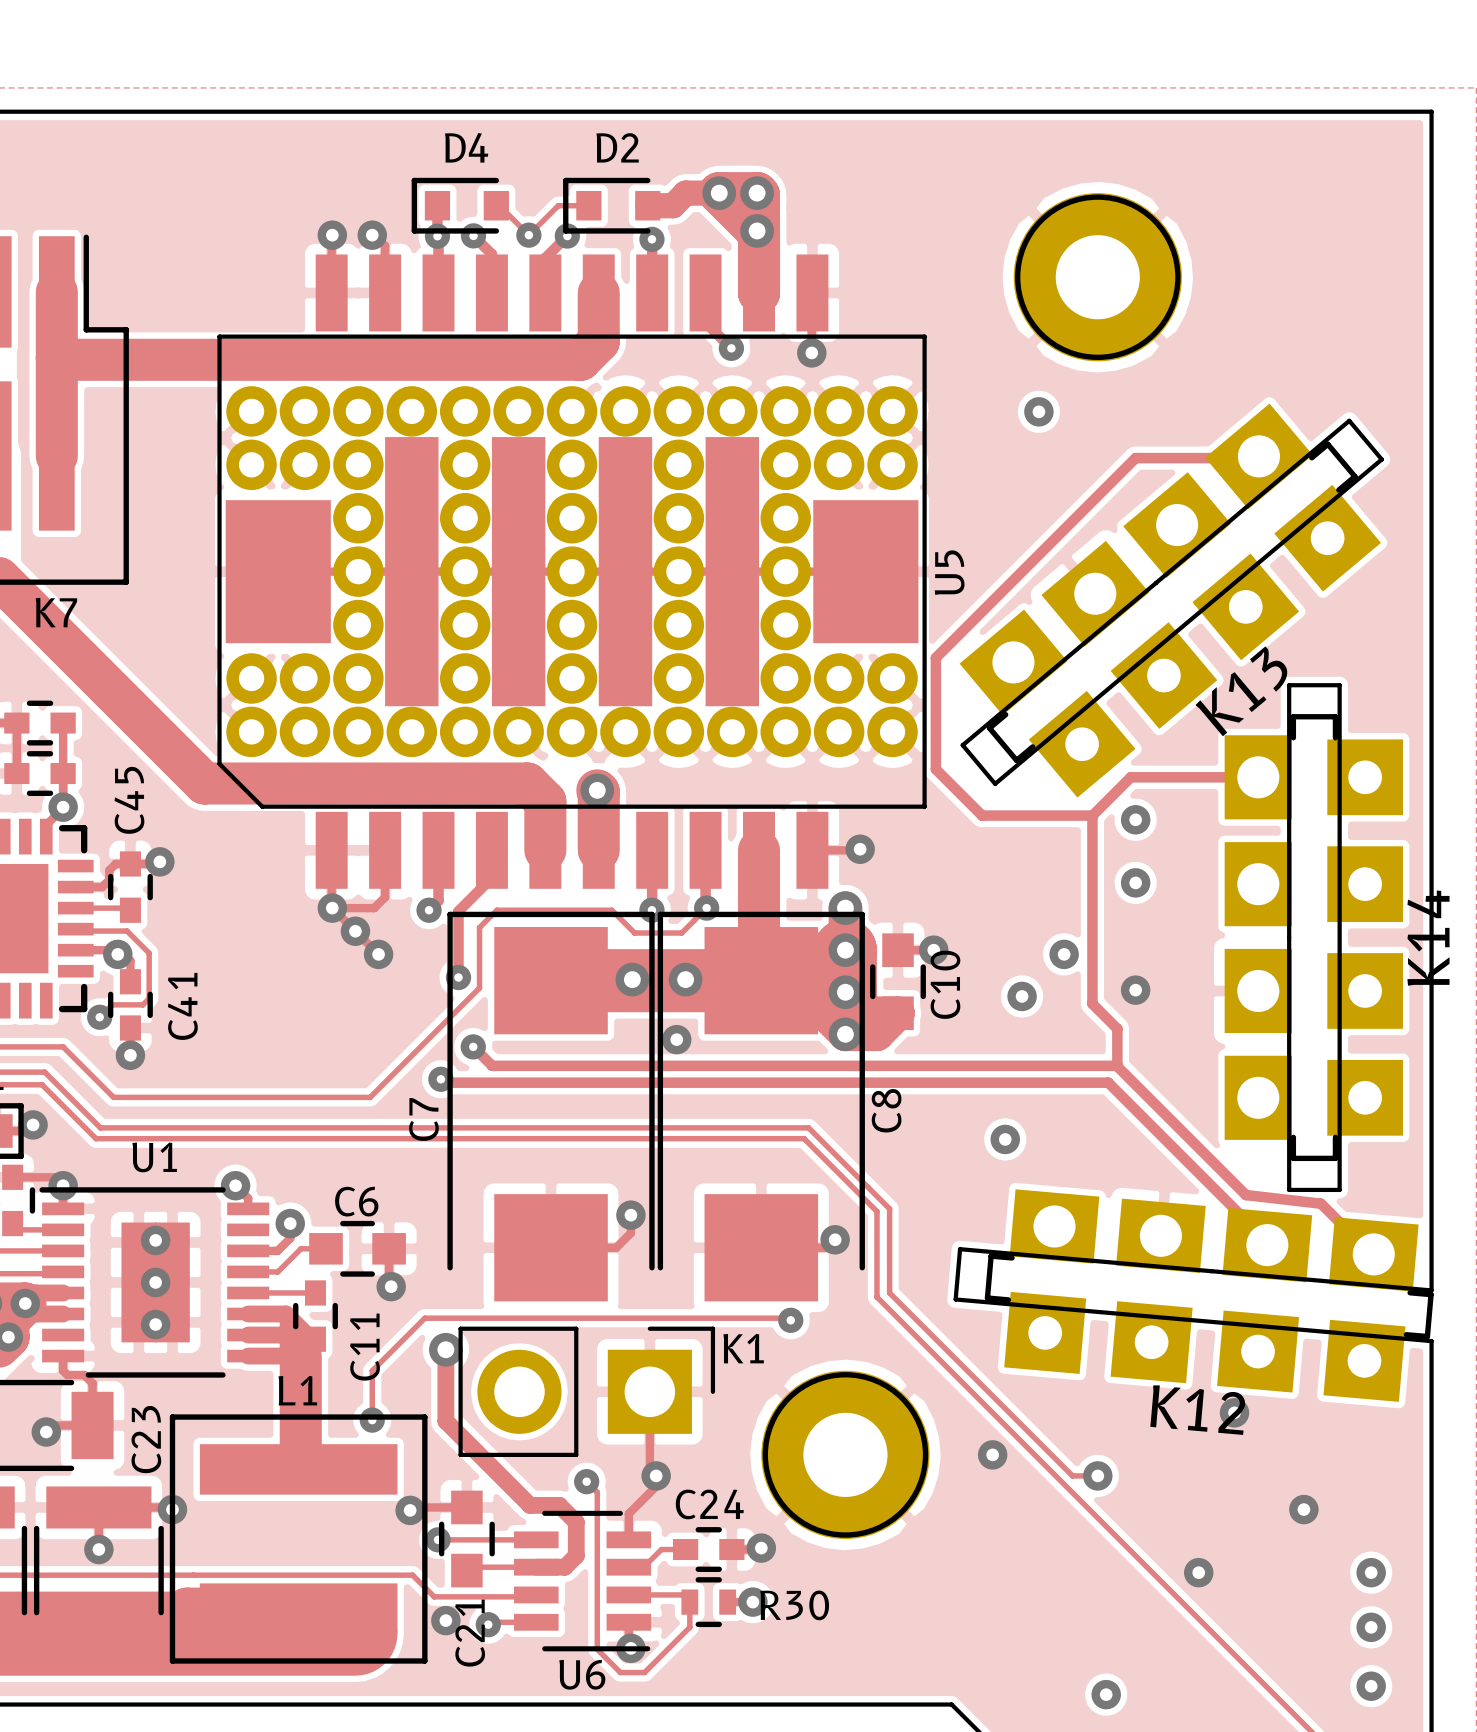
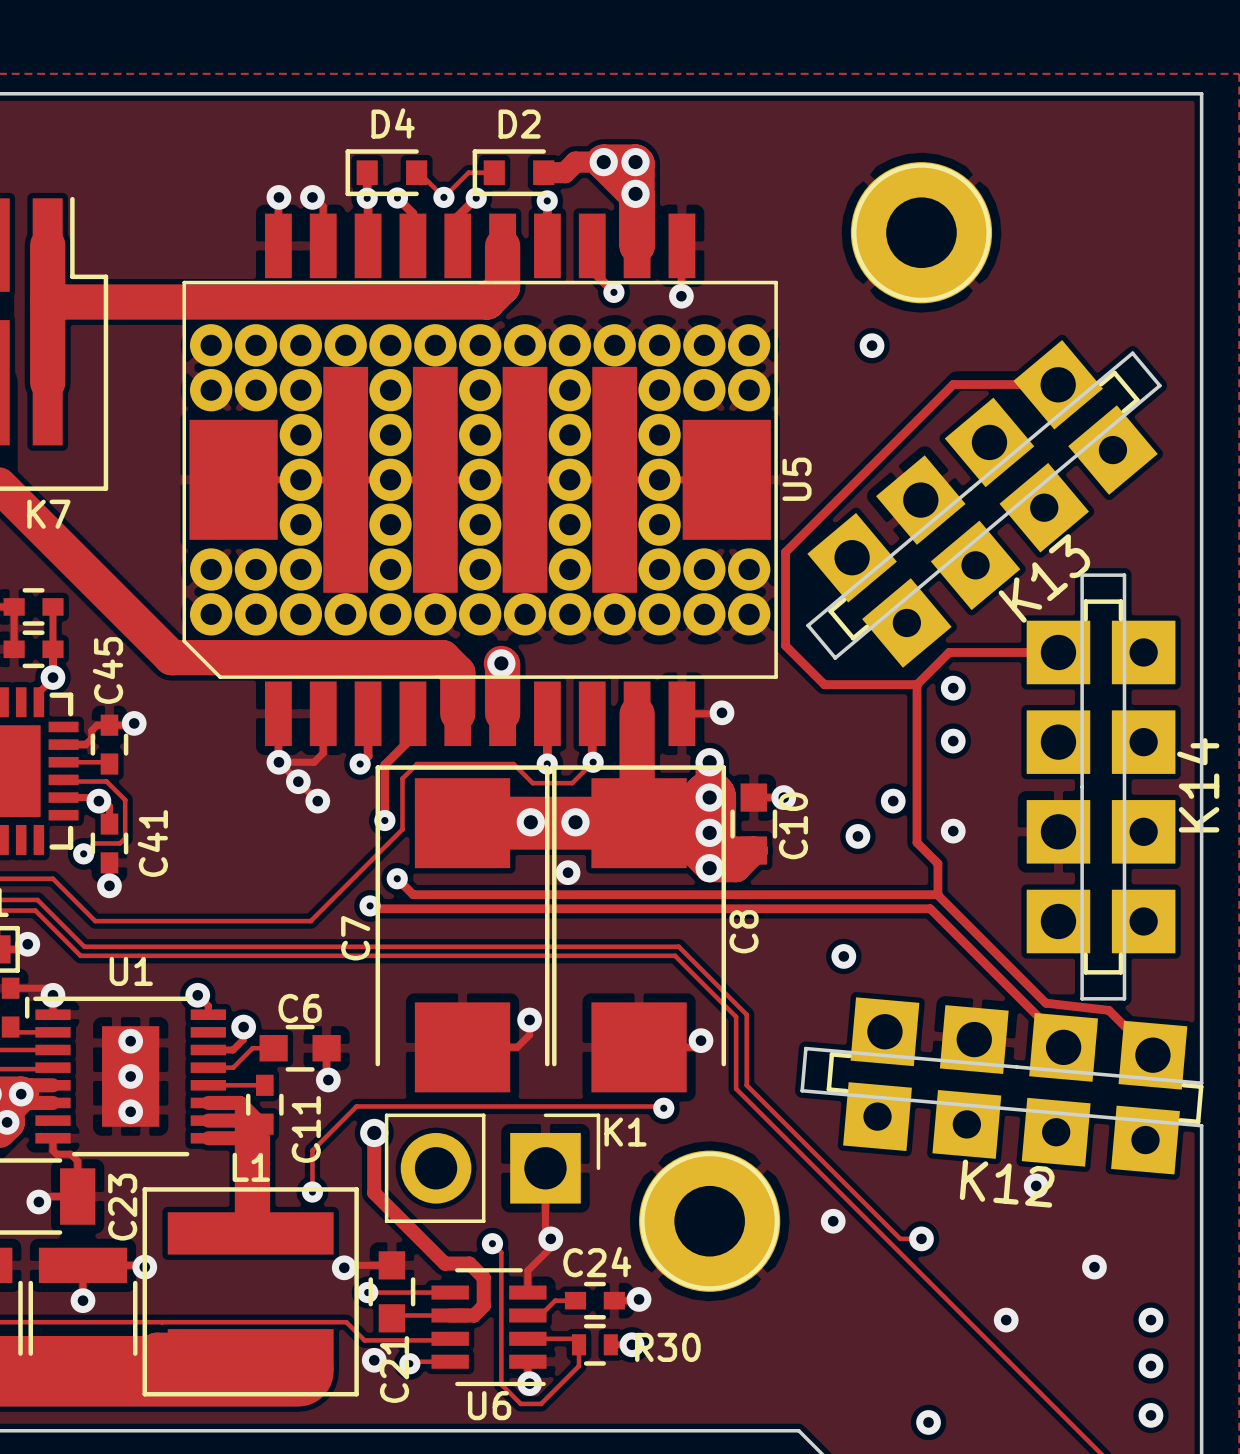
K13 footprint: [959, 403, 1381, 798] -> [807, 340, 1158, 668]
K14 footprint: [1224, 714, 1404, 1162] -> [1026, 599, 1176, 975]
K12 footprint: [984, 1189, 1434, 1402] -> [826, 997, 1204, 1175]

